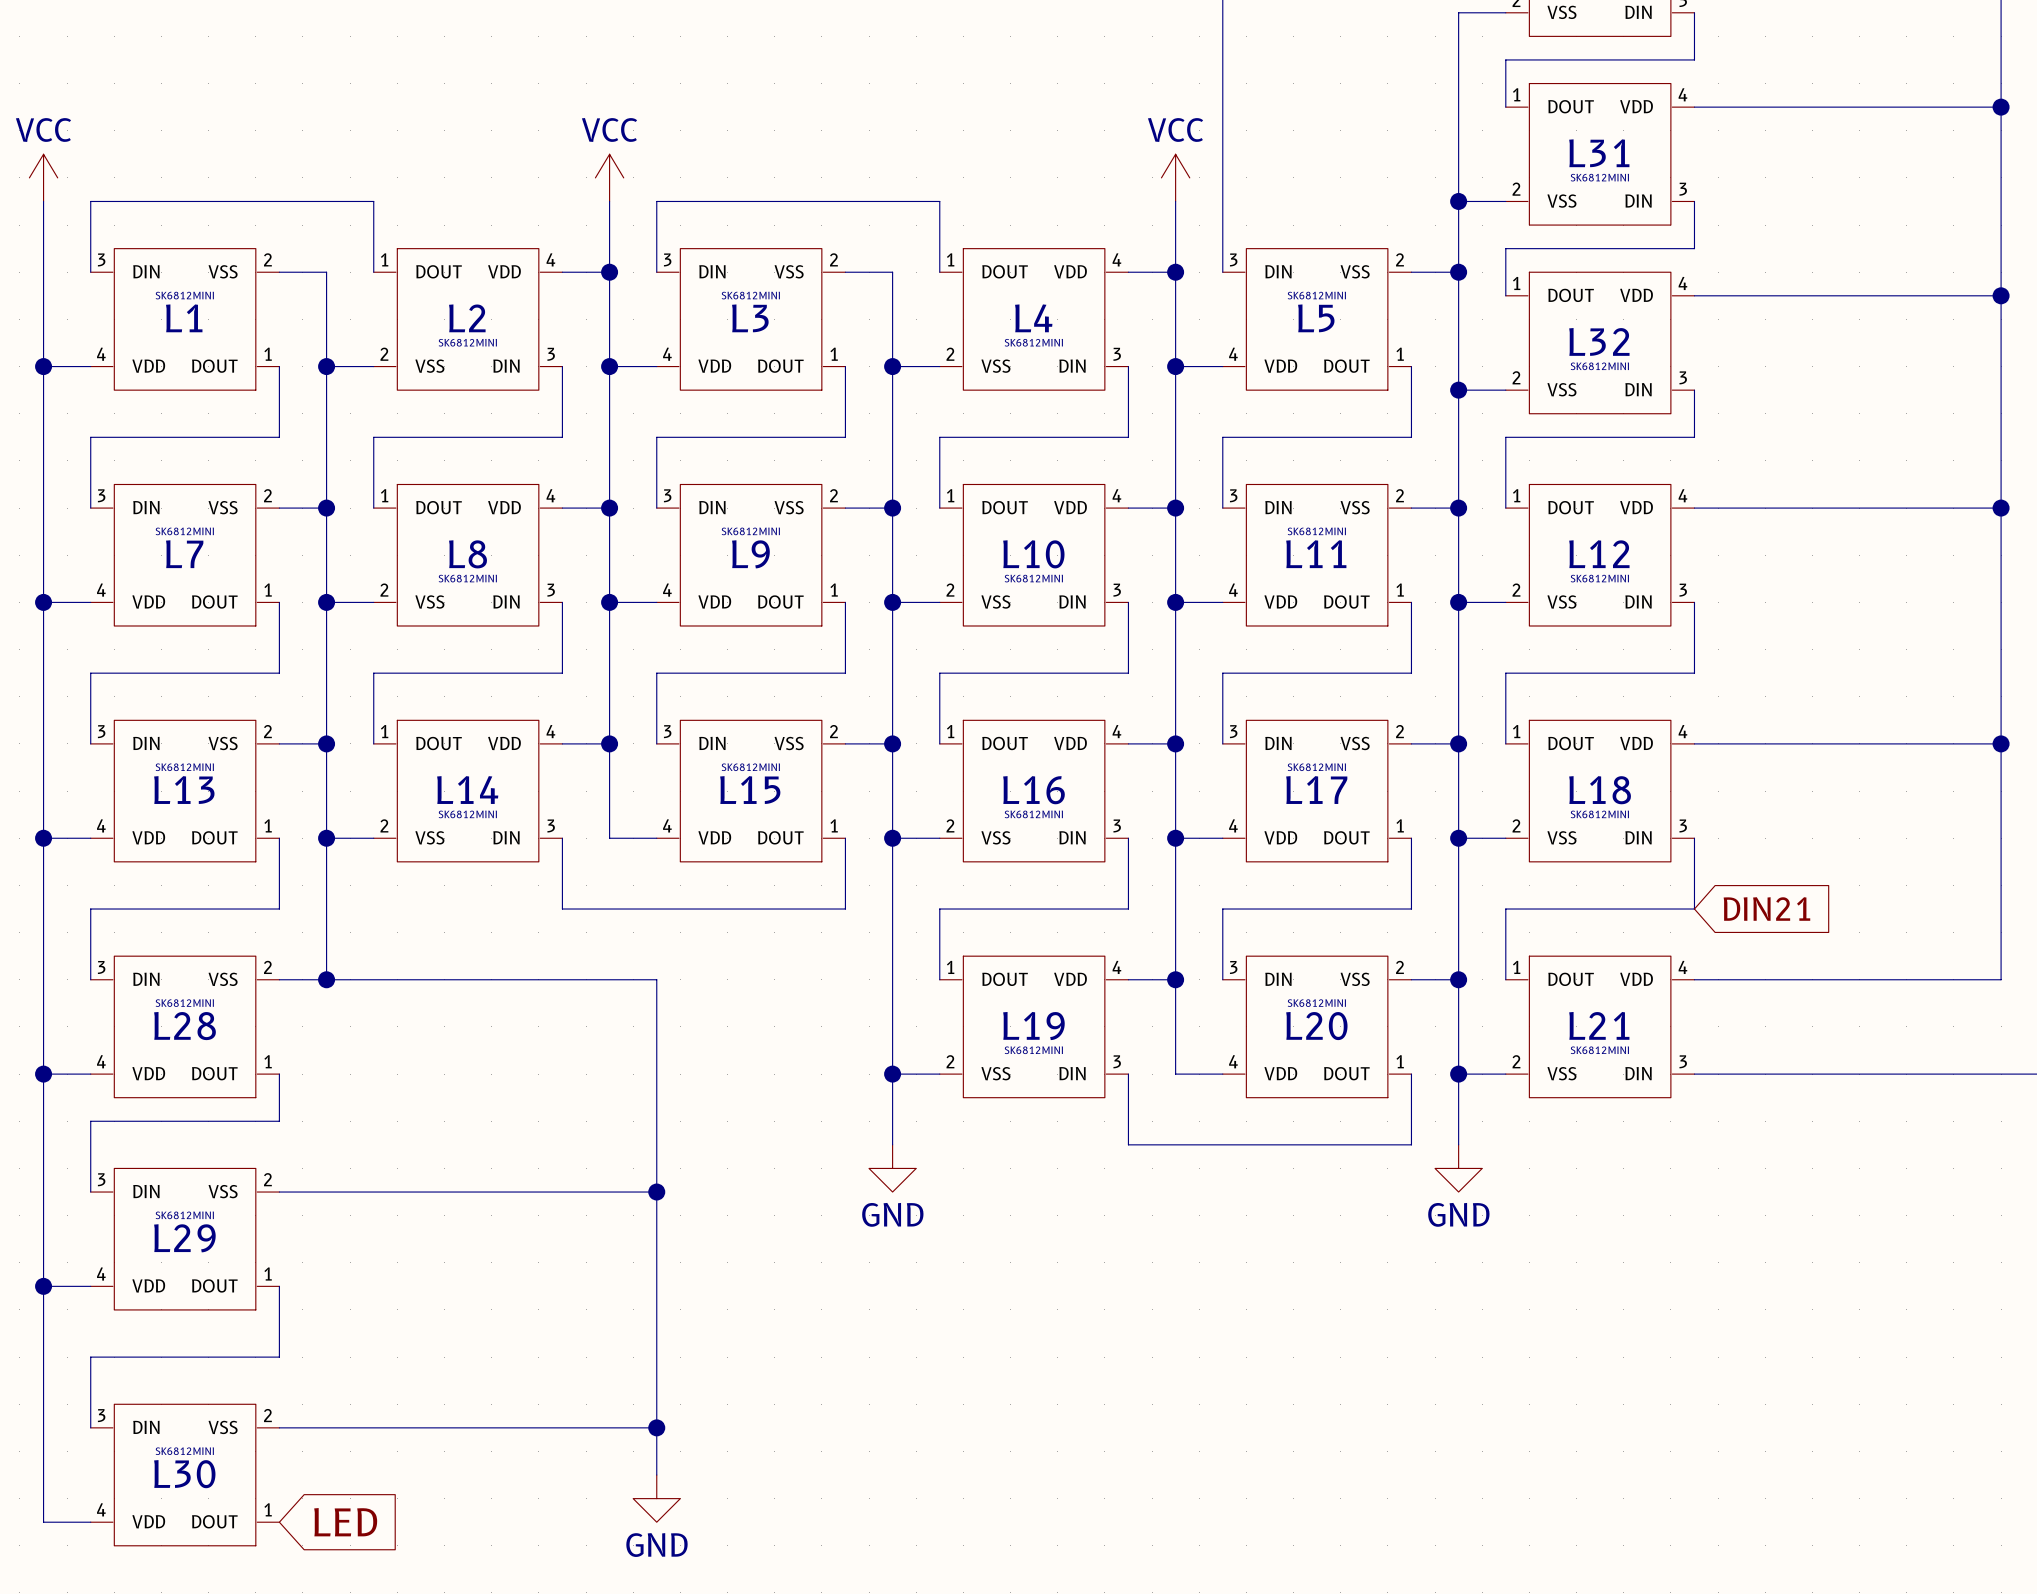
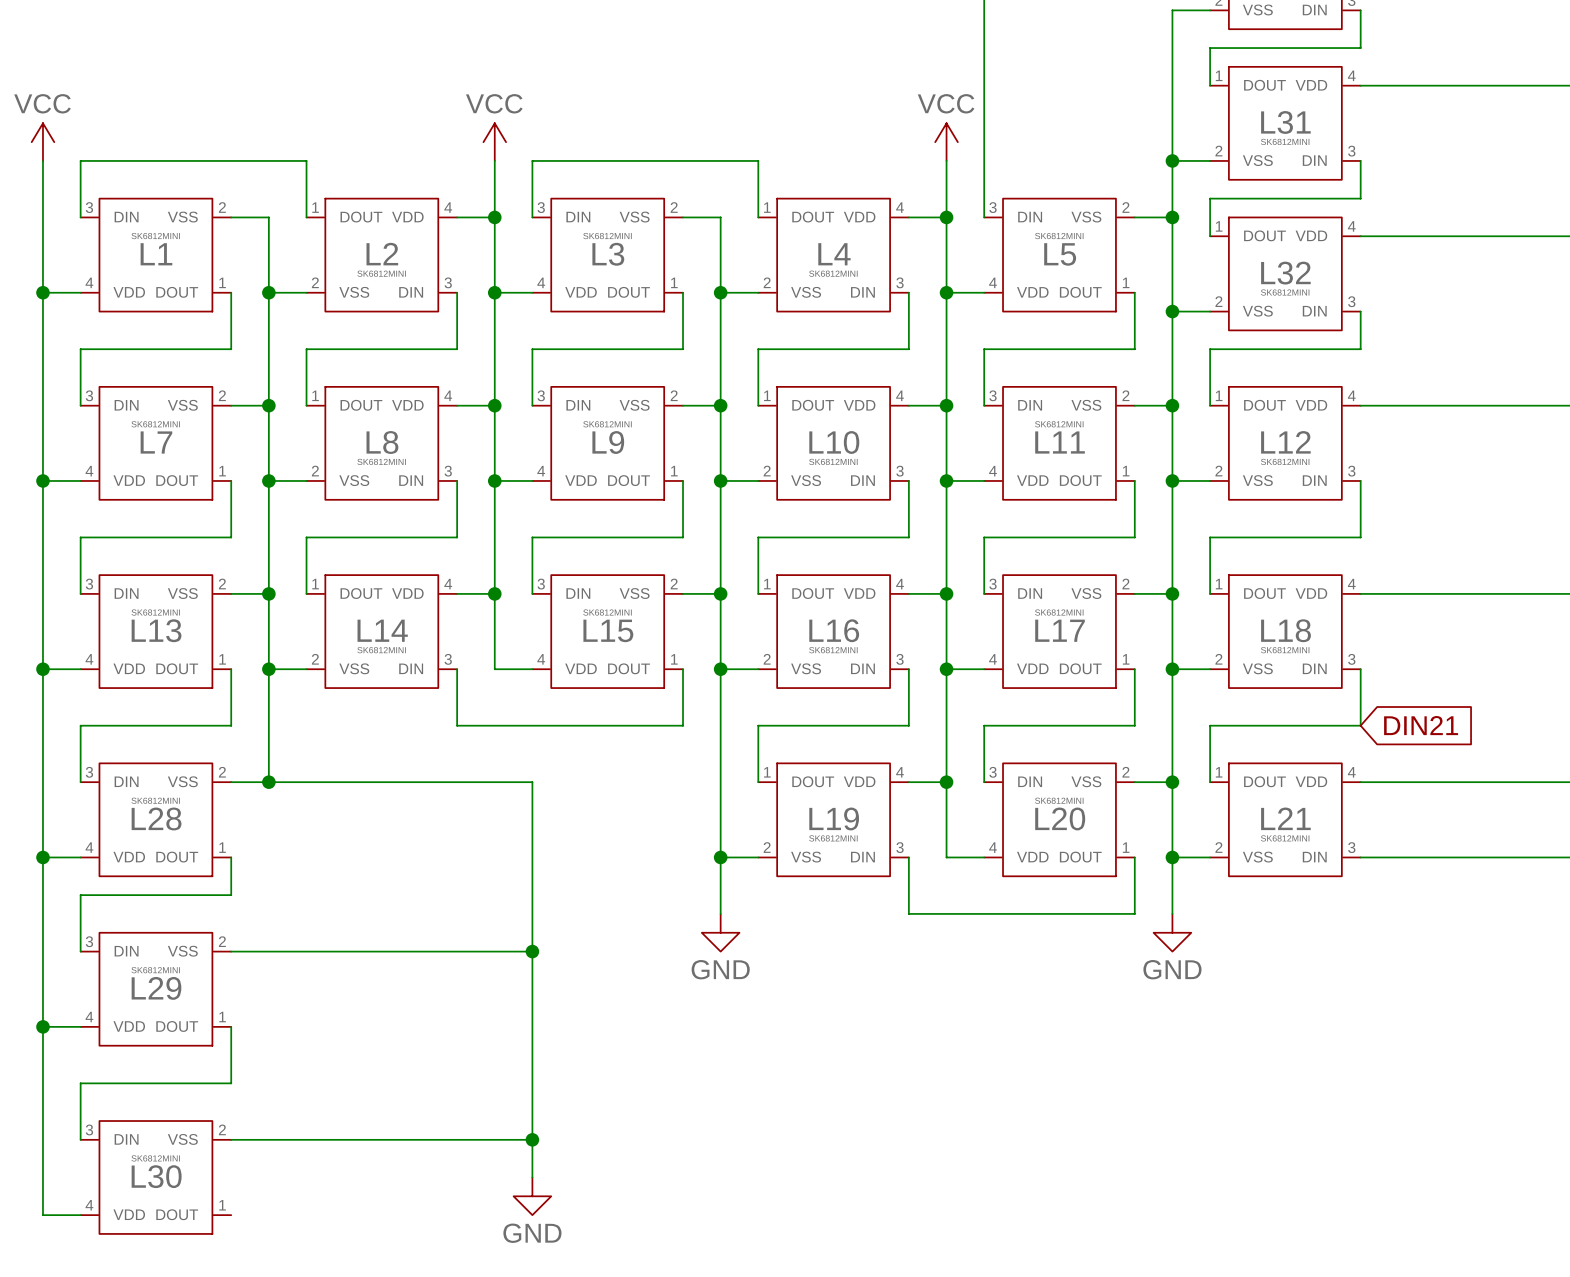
global label: LED (345, 1522) -> none

